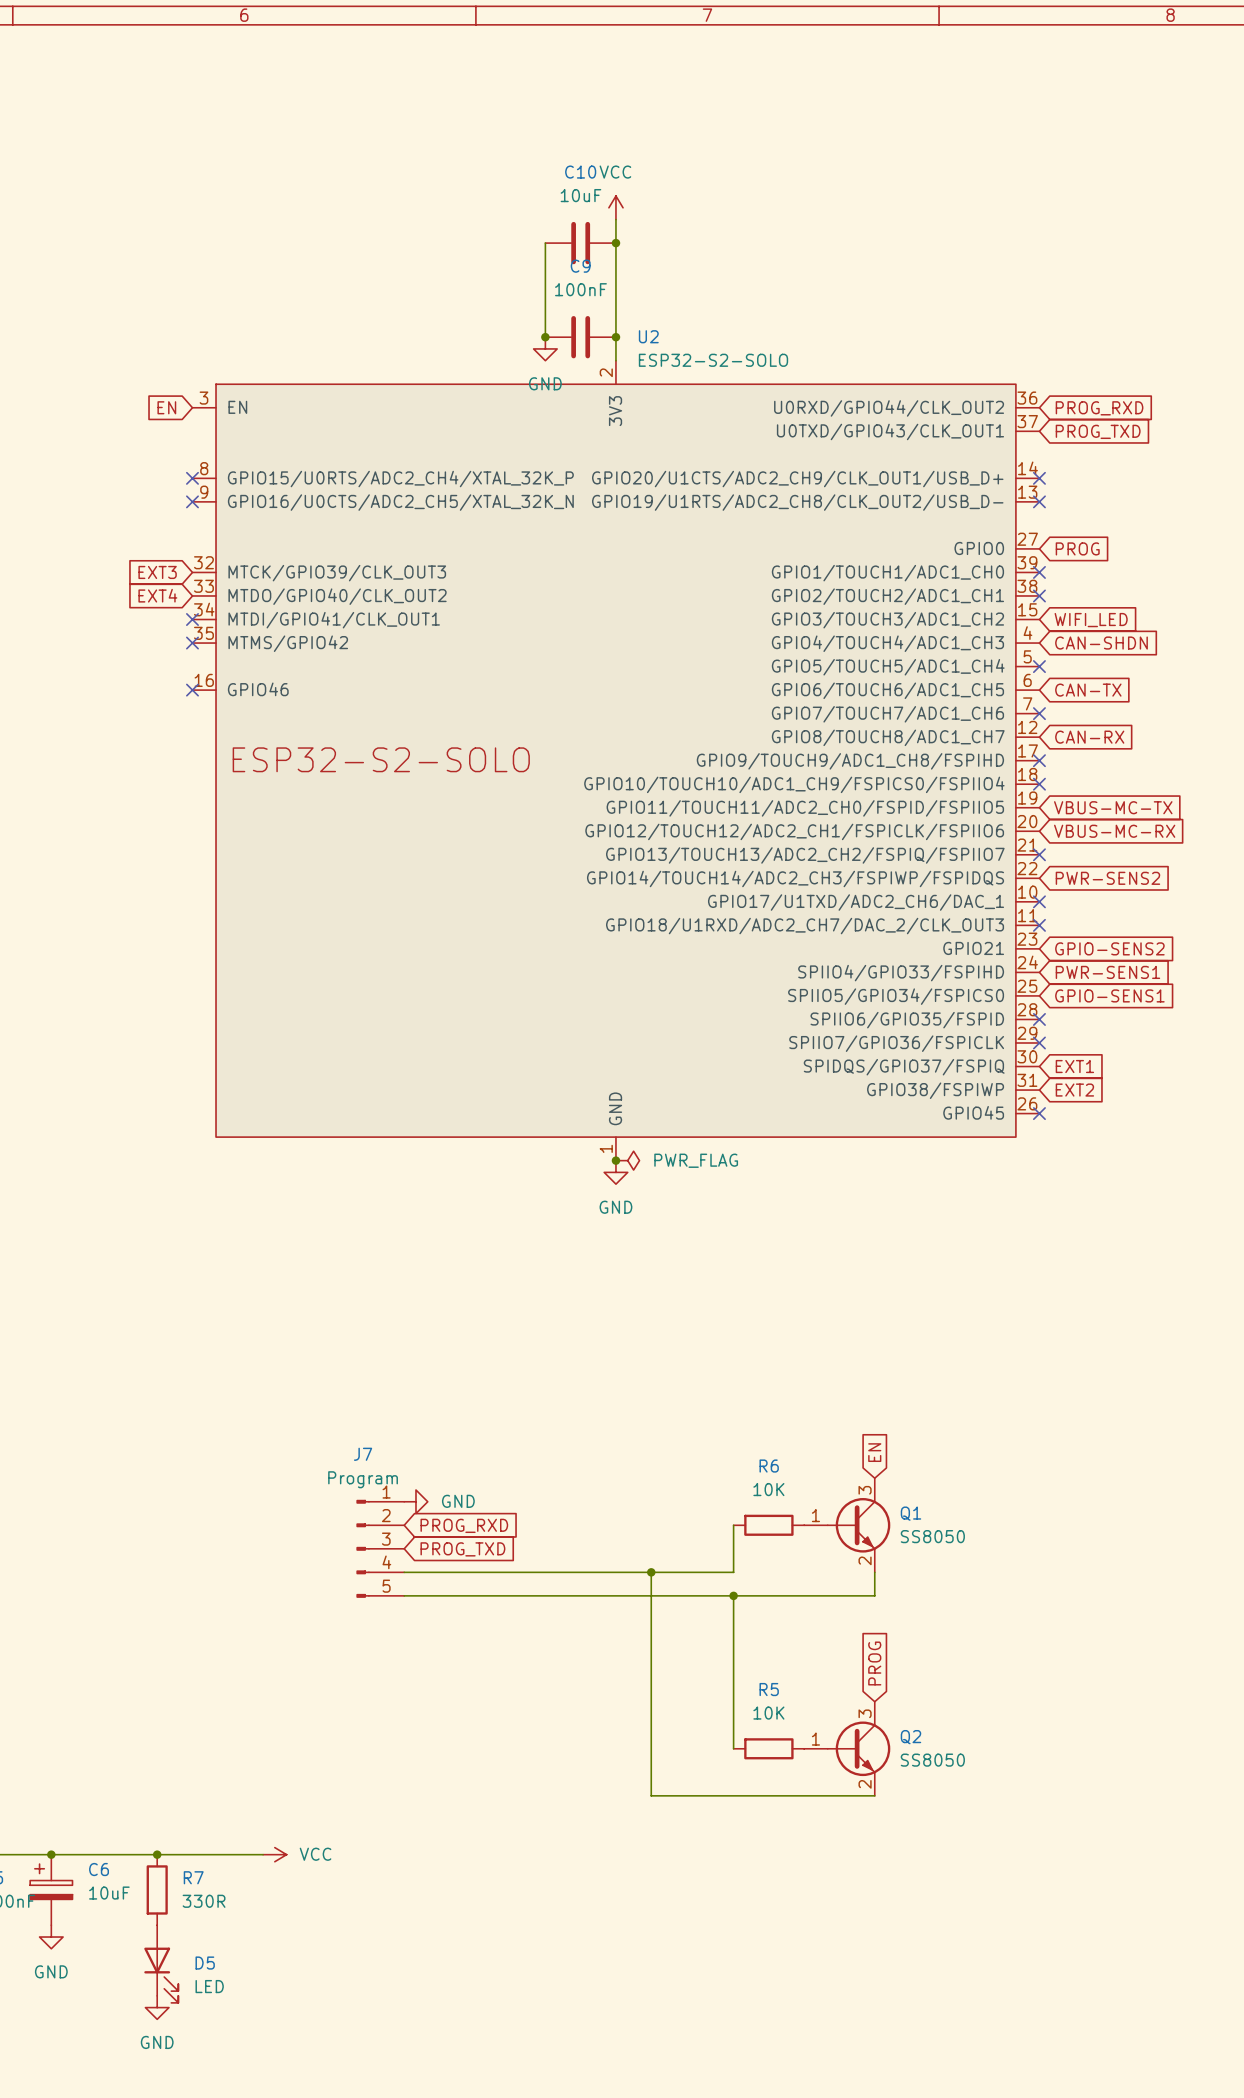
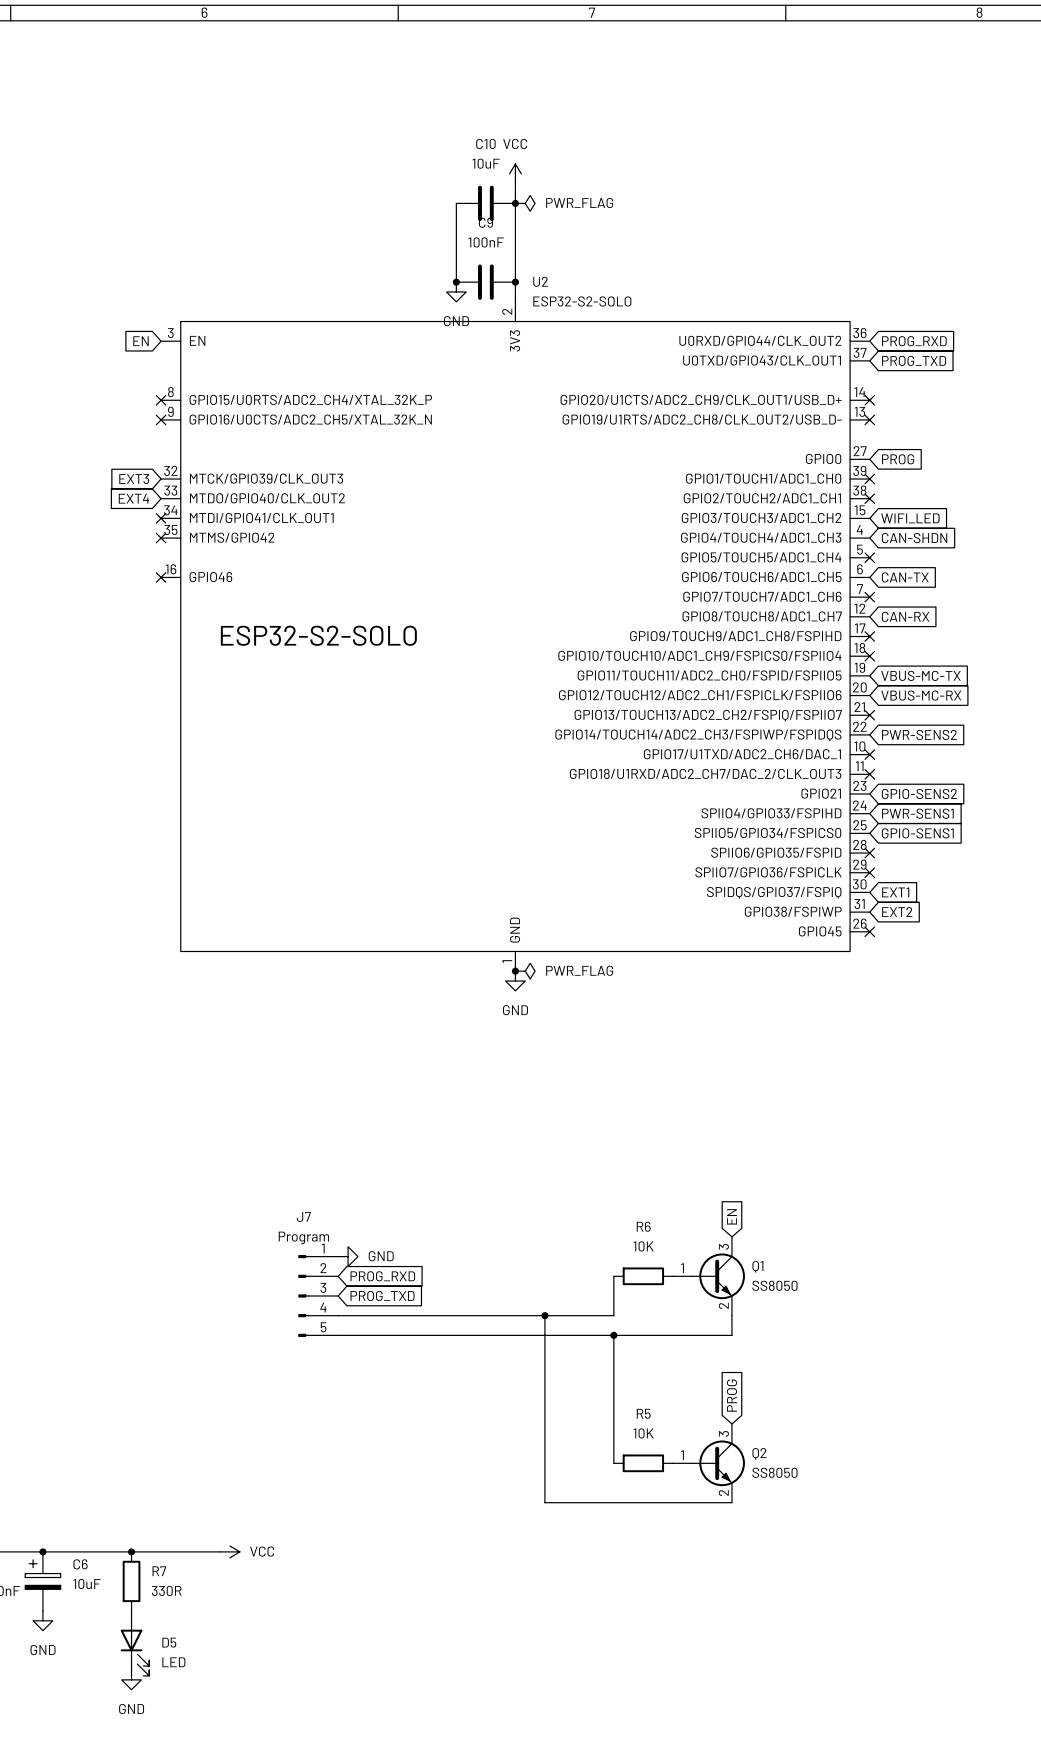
power symbol: none -> PWR_FLAG (525, 203)

